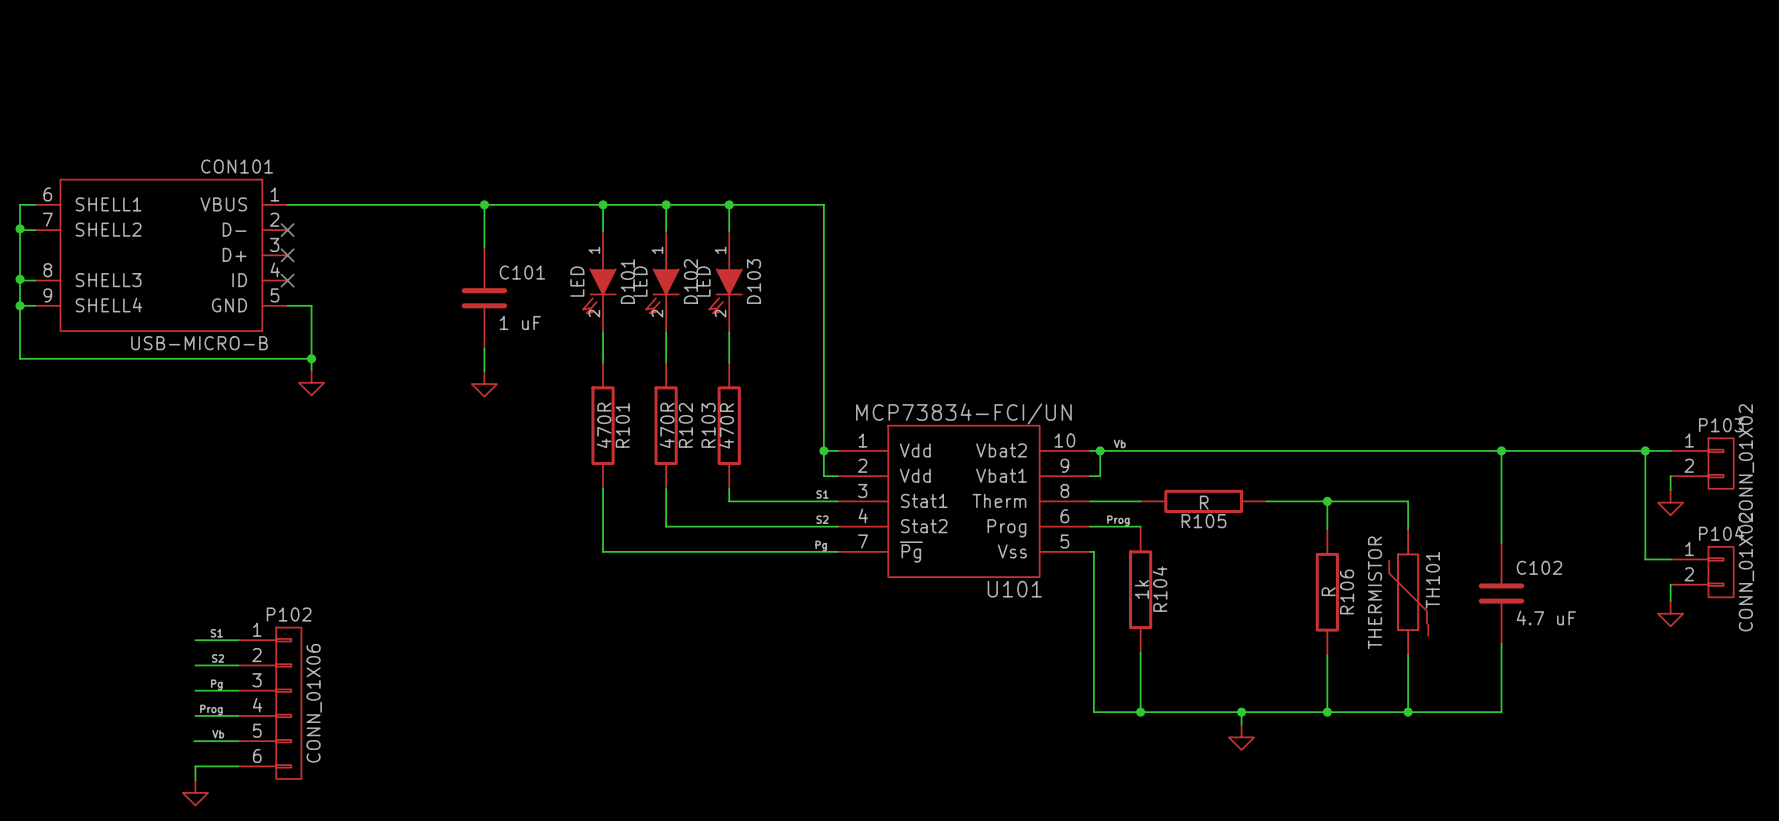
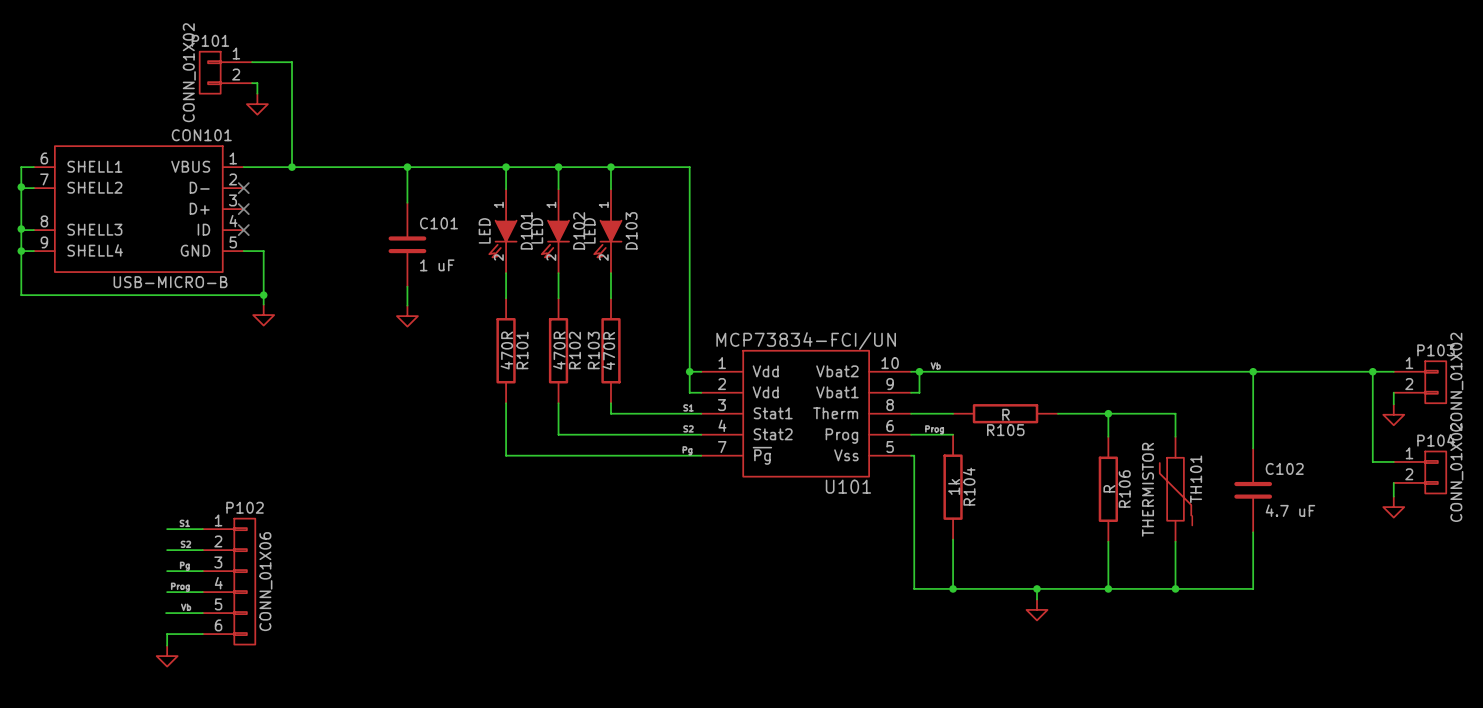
wire: none -> (252, 62) (292, 62) (292, 167)
P101: none -> CONN_01X02 (225, 72)
wire: none -> (252, 83) (257, 83) (257, 93)
power symbol: none -> (257, 104)
junction: none -> (292, 167)

